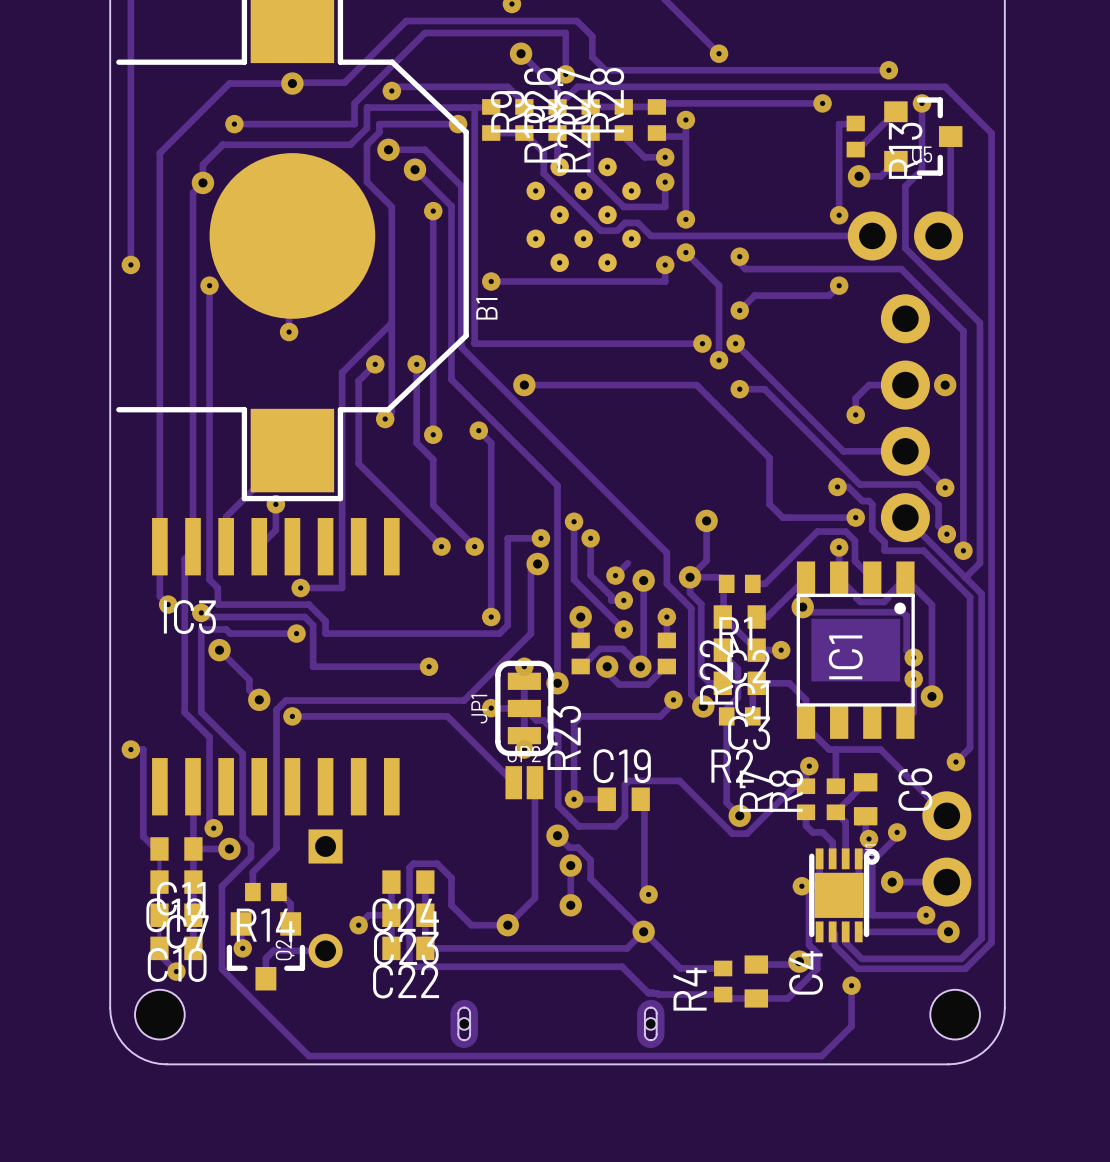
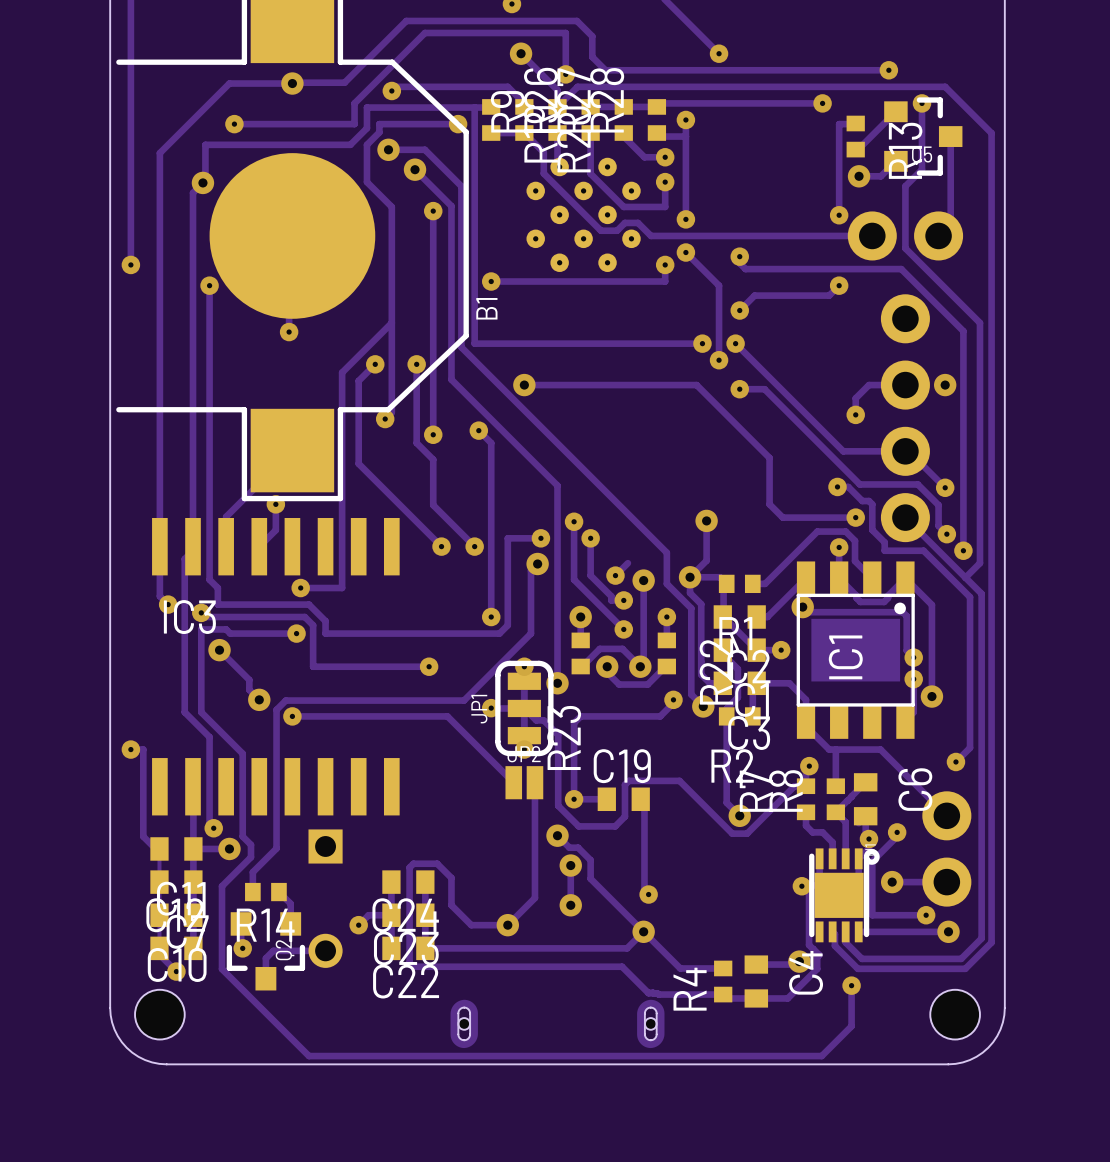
track: (222, 144) (202, 164) (202, 182) -> (222, 144) (205, 144) (205, 182) (202, 182)

